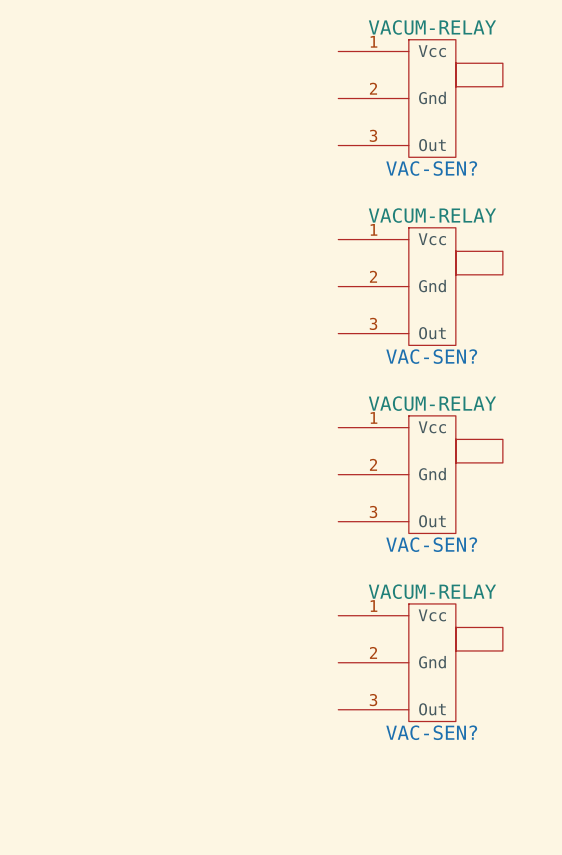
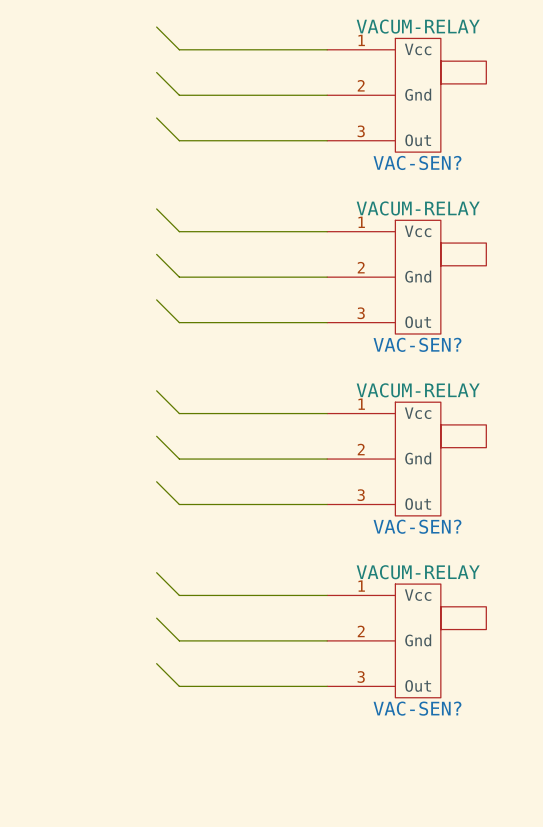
wire: none -> (156, 27) (179, 49) (327, 49)
wire: none -> (156, 72) (179, 95) (327, 95)
wire: none -> (156, 118) (179, 140) (327, 140)
wire: none -> (156, 208) (179, 231) (327, 231)
wire: none -> (156, 254) (179, 277) (327, 277)
wire: none -> (156, 299) (179, 322) (327, 322)
wire: none -> (156, 390) (179, 413) (327, 413)
wire: none -> (156, 436) (179, 459) (327, 459)
wire: none -> (156, 481) (179, 504) (327, 504)
wire: none -> (156, 572) (179, 595) (327, 595)
wire: none -> (156, 618) (179, 640) (327, 640)
wire: none -> (156, 663) (179, 686) (327, 686)

